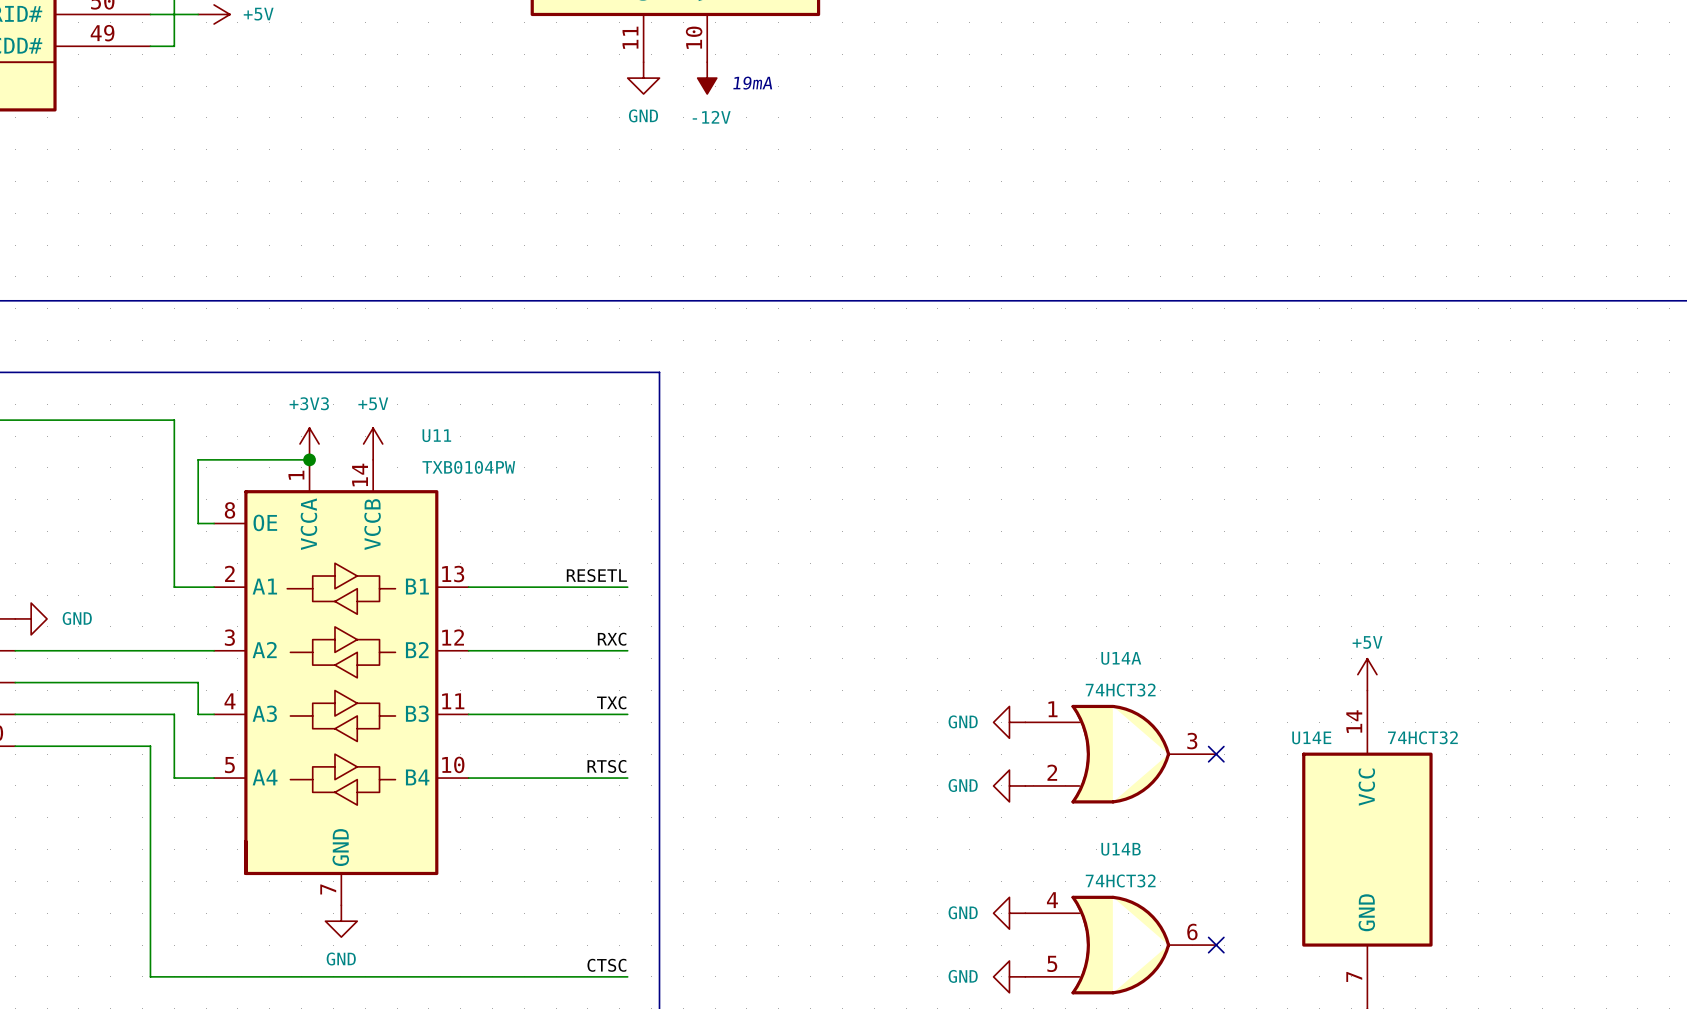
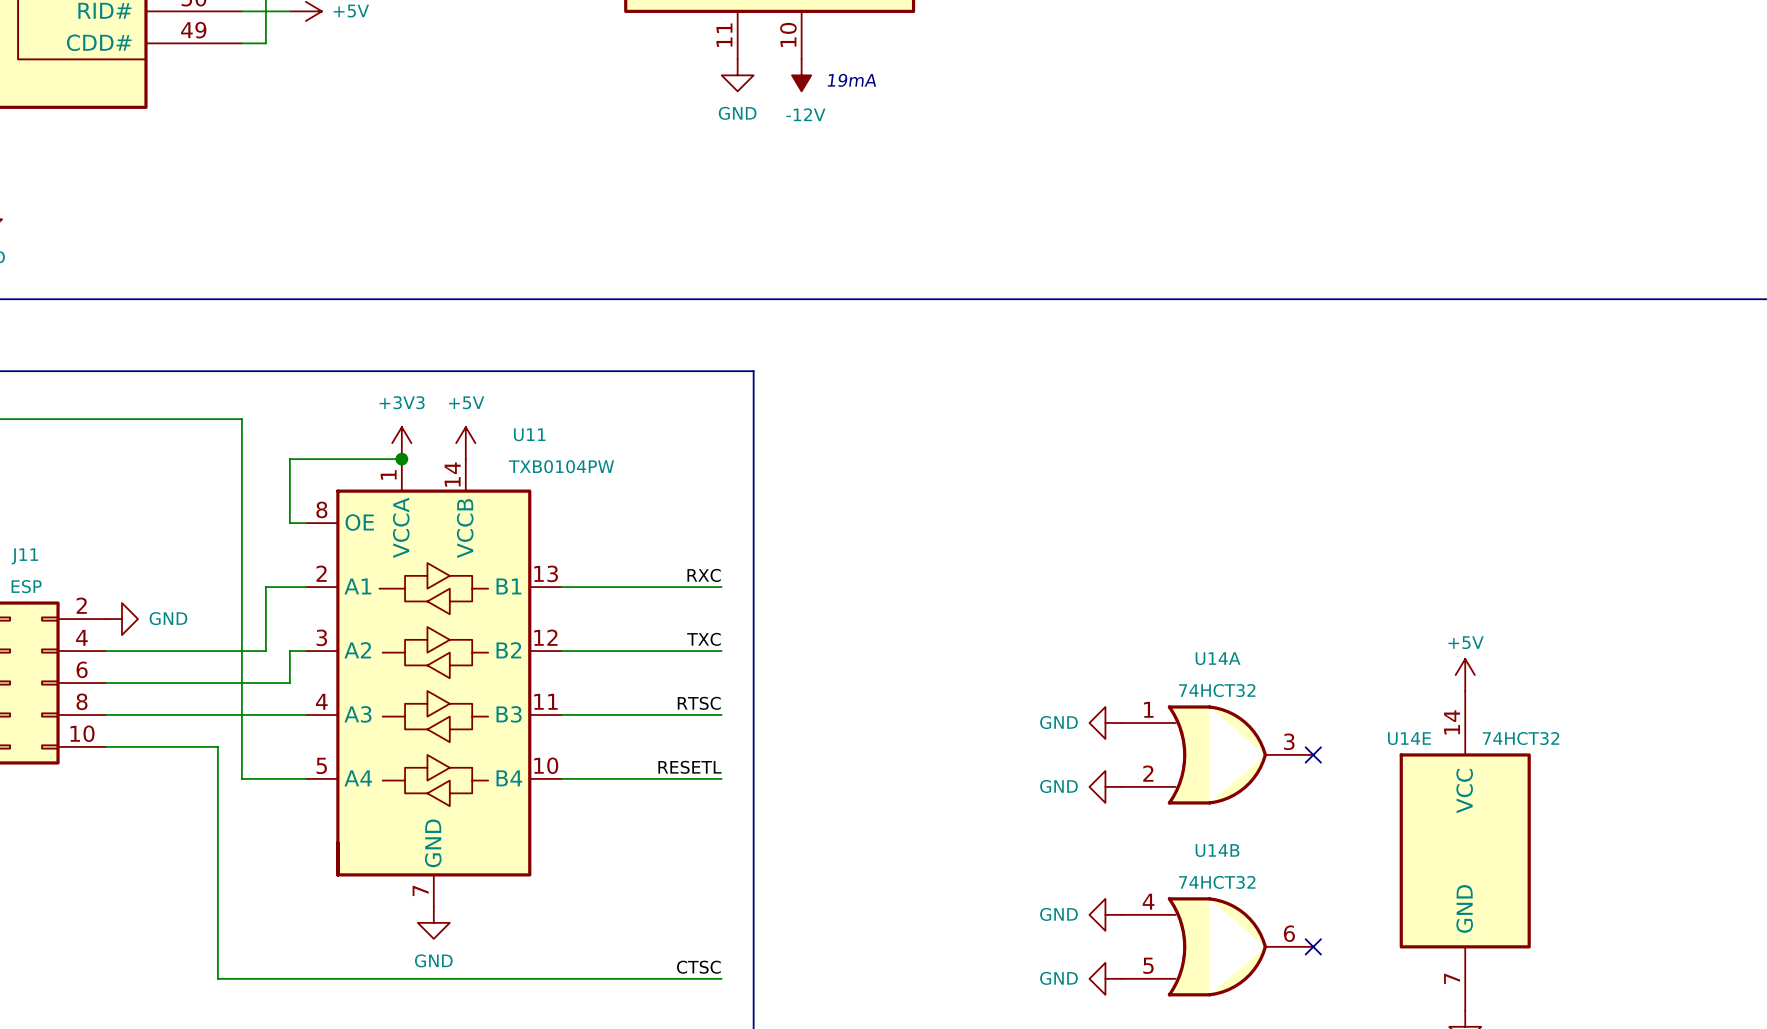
wire: (150, 420) (174, 420) (174, 587) -> (241, 419) (241, 746)
label: RESETL (596, 575) -> RXC (704, 575)
wire: none -> (265, 587) (265, 651)
label: RXC (612, 639) -> TXC (703, 639)
wire: (174, 650) (198, 650) -> (289, 683) (289, 651)
wire: (198, 682) (198, 714) -> (265, 714) (289, 714)
label: TXC (611, 702) -> RTSC (699, 703)
wire: (174, 714) (174, 778) -> (241, 778) (265, 778)
wire: (126, 746) (150, 746) -> none
label: RTSC (606, 766) -> RESETL (689, 767)
wire: (150, 778) (150, 976) -> (217, 746) (217, 978) (241, 978)

